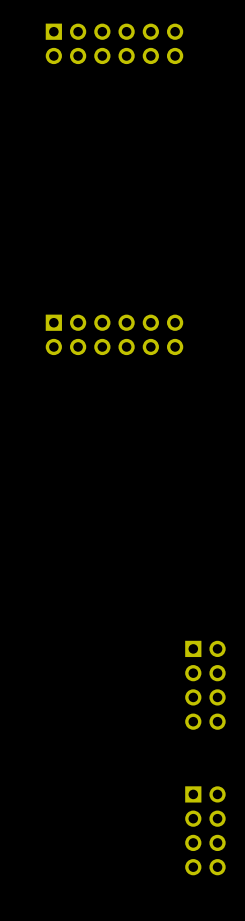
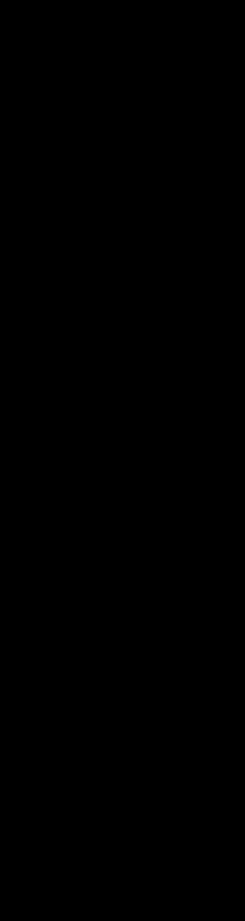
part: (114, 43) -> none
part: (114, 334) -> none
part: (205, 685) -> none
part: (205, 830) -> none

